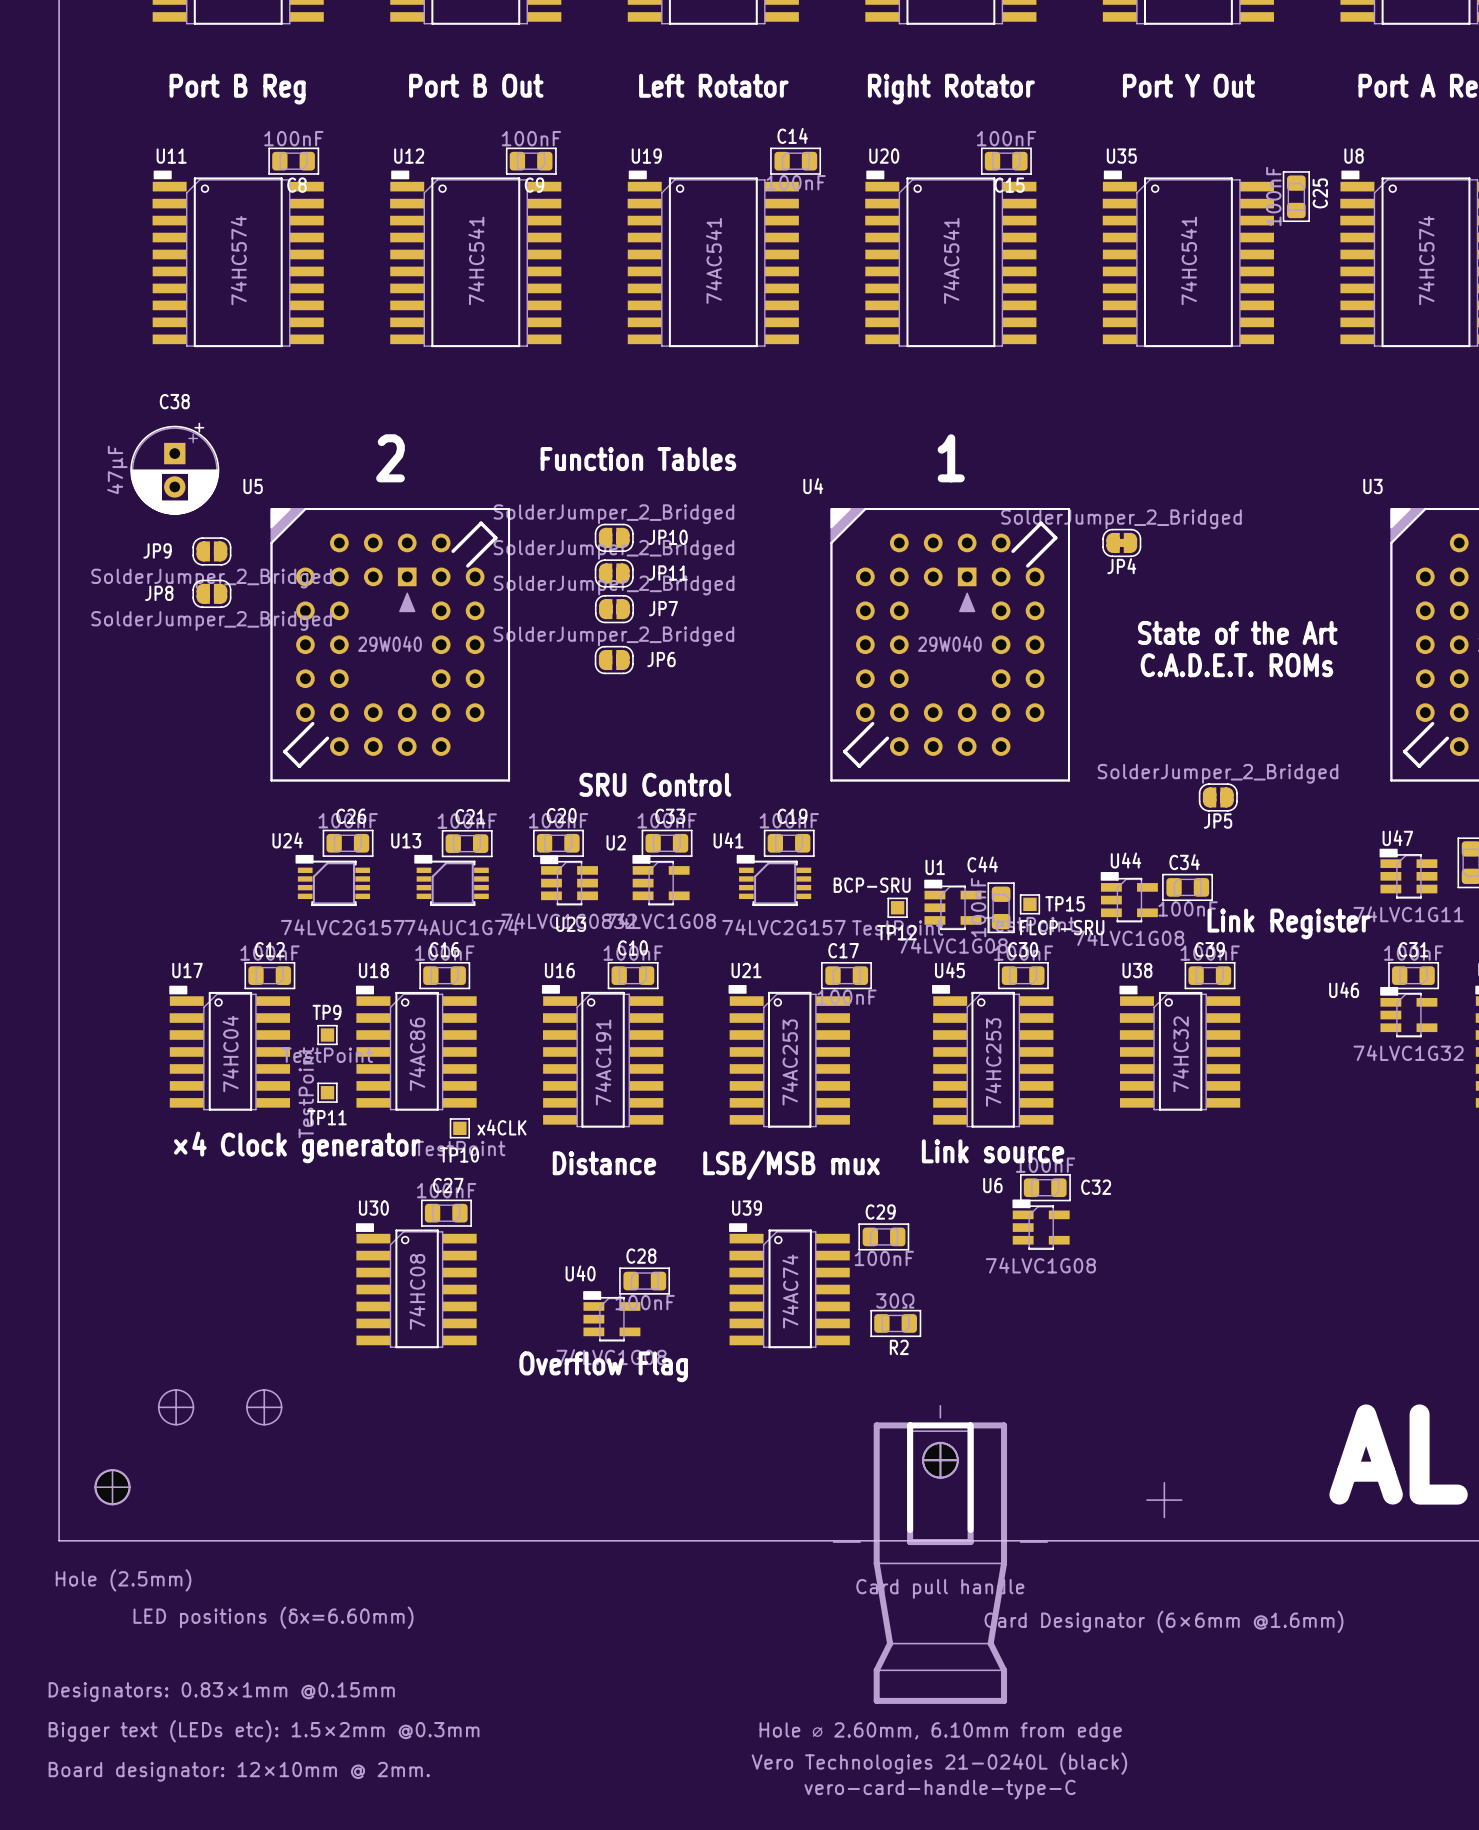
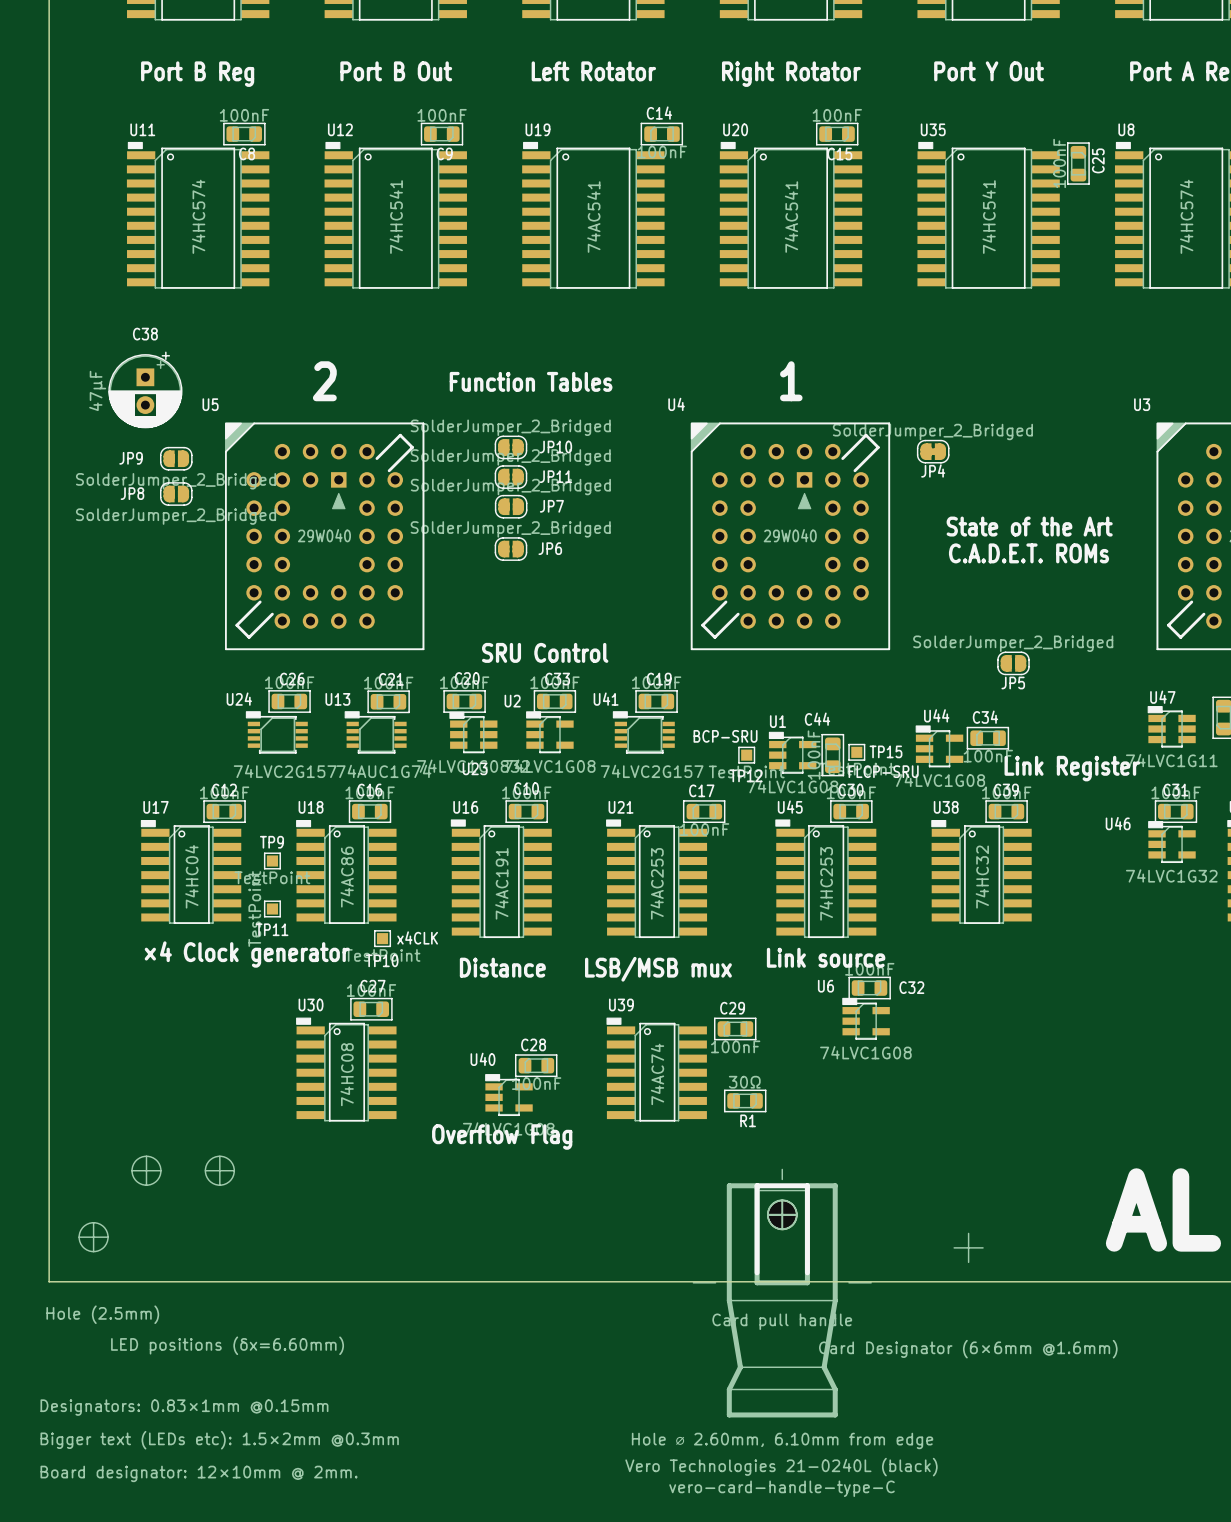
R2 name: R2 (899, 1347) -> R1 (748, 1120)
part: (112, 1487) -> none

